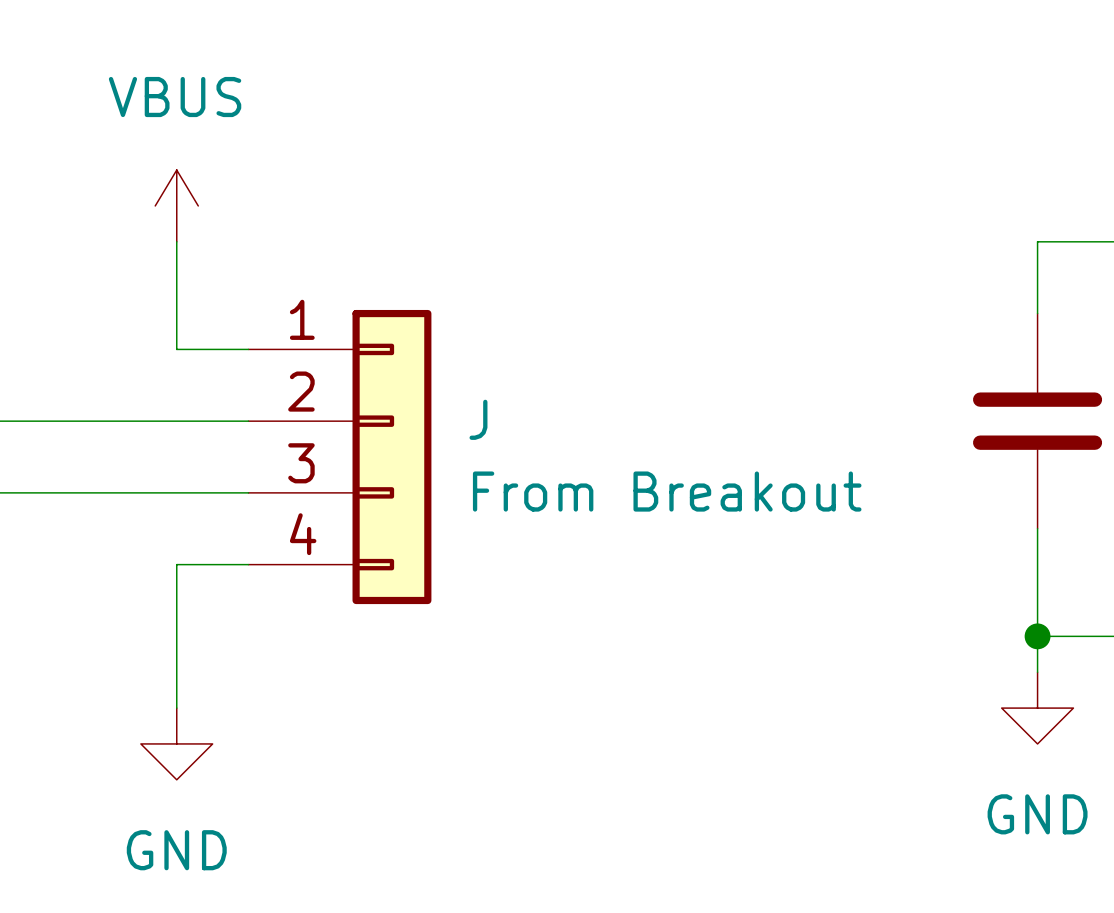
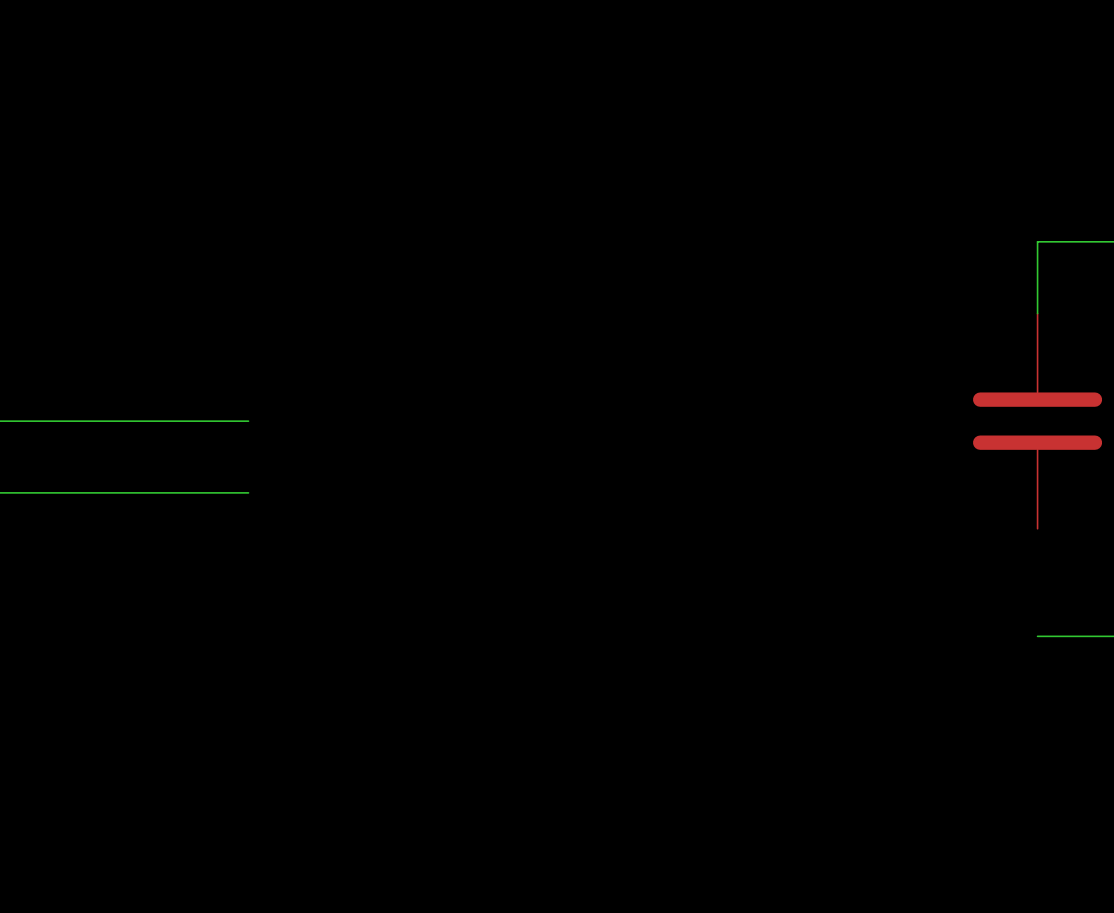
power symbol: VBUS (176, 205) -> none
wire: (176, 241) (176, 349) (248, 349) -> none
J: From Breakout (339, 457) -> none
wire: (1037, 528) (1037, 672) -> none
wire: (248, 564) (176, 564) (176, 708) -> none
junction: (1037, 636) -> none
power symbol: GND (1037, 708) -> none
power symbol: GND (176, 743) -> none

